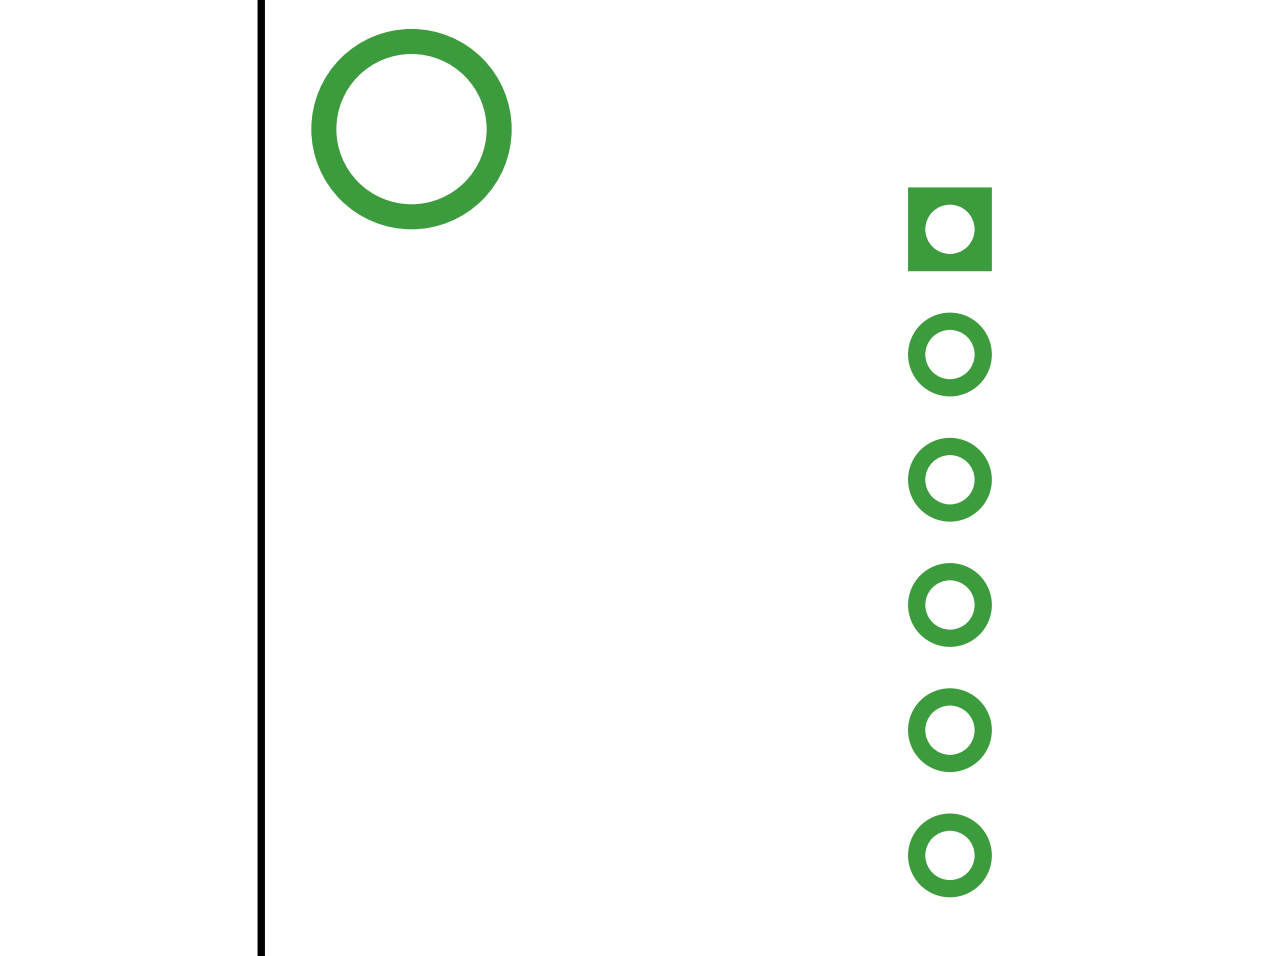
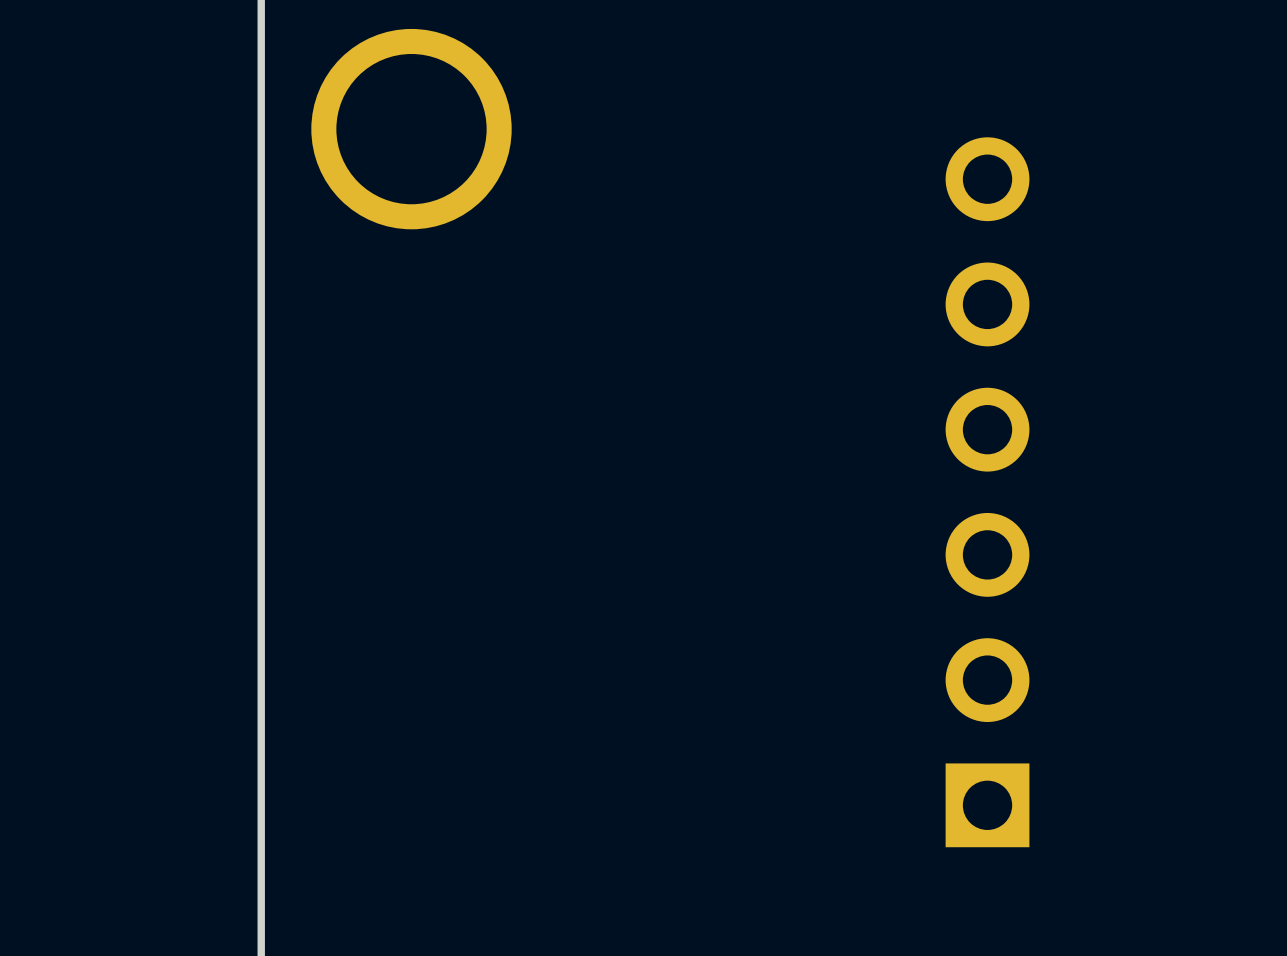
part rotation: 0° (949, 542) -> 180° (987, 492)

